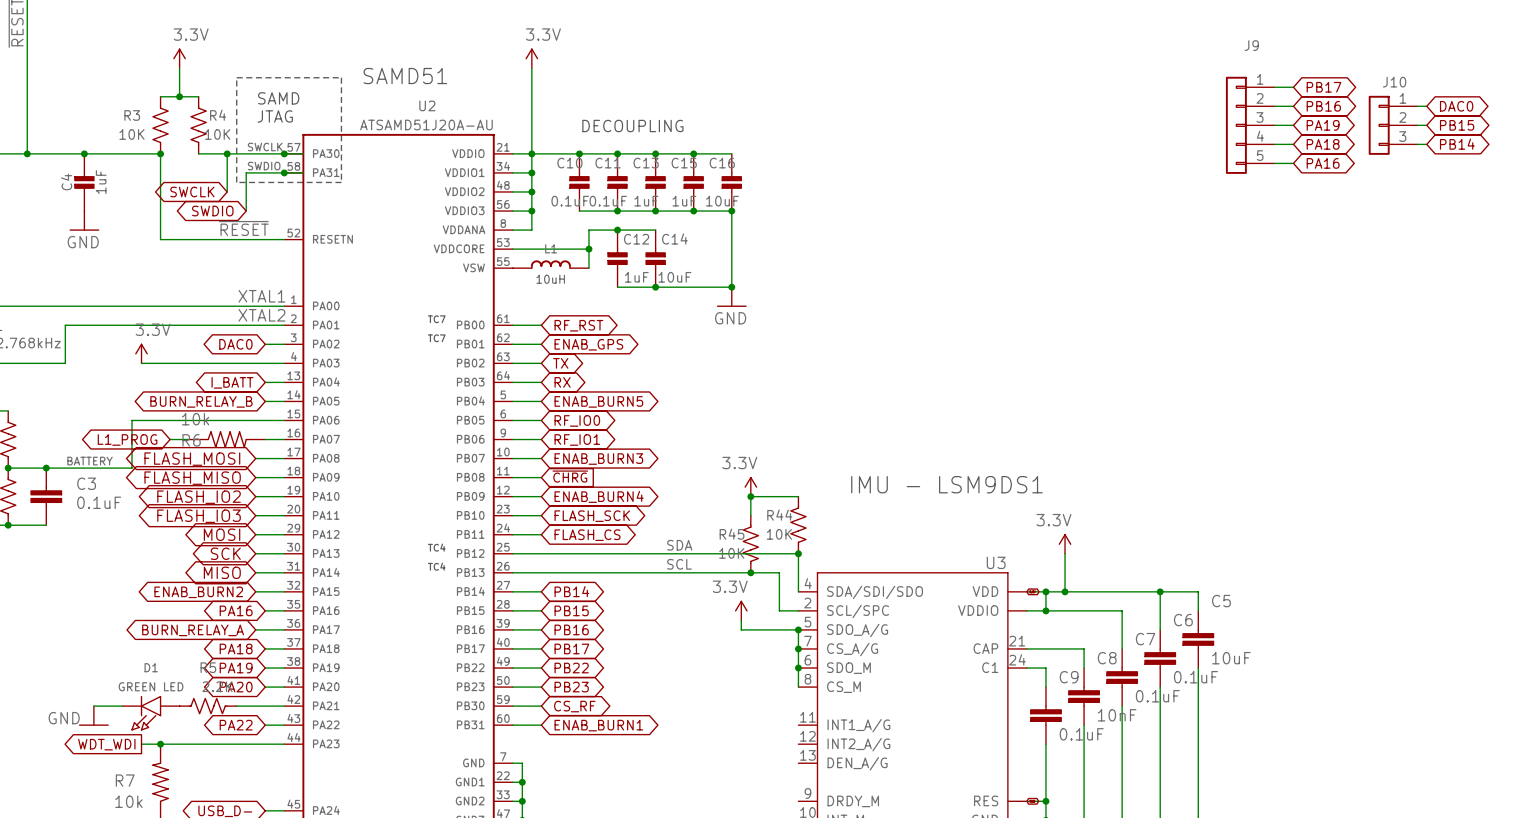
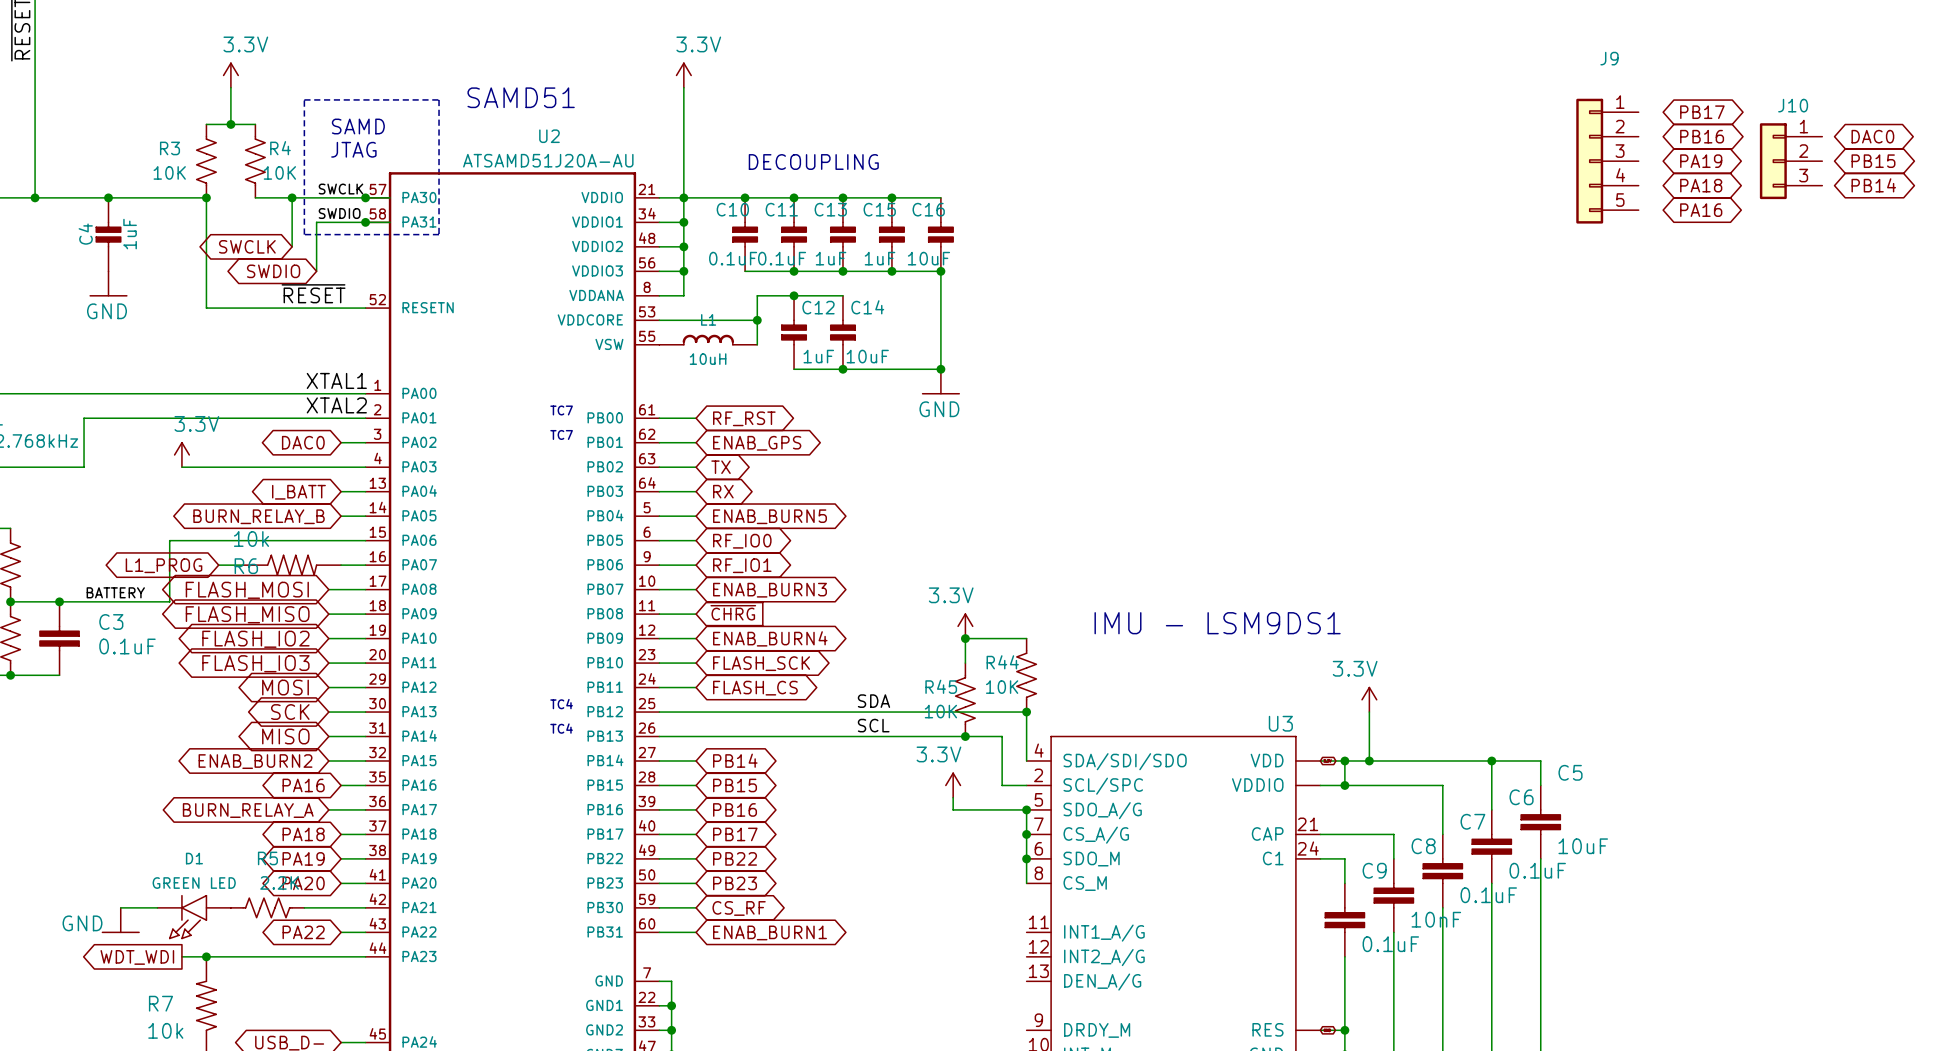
wire: (1274, 87) (1293, 87) -> none
wire: (1274, 106) (1293, 106) -> none
wire: (1417, 106) (1426, 106) -> none
wire: (1274, 125) (1293, 125) -> none
wire: (1417, 125) (1426, 125) -> none
wire: (1274, 144) (1293, 144) -> none
wire: (1417, 144) (1426, 144) -> none
wire: (1274, 163) (1293, 163) -> none

